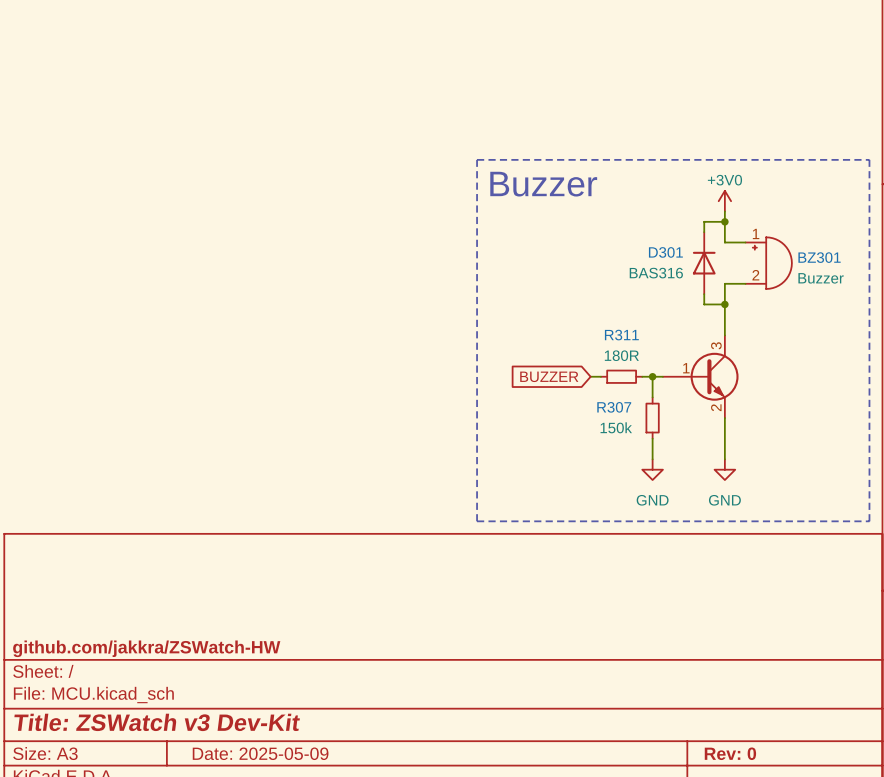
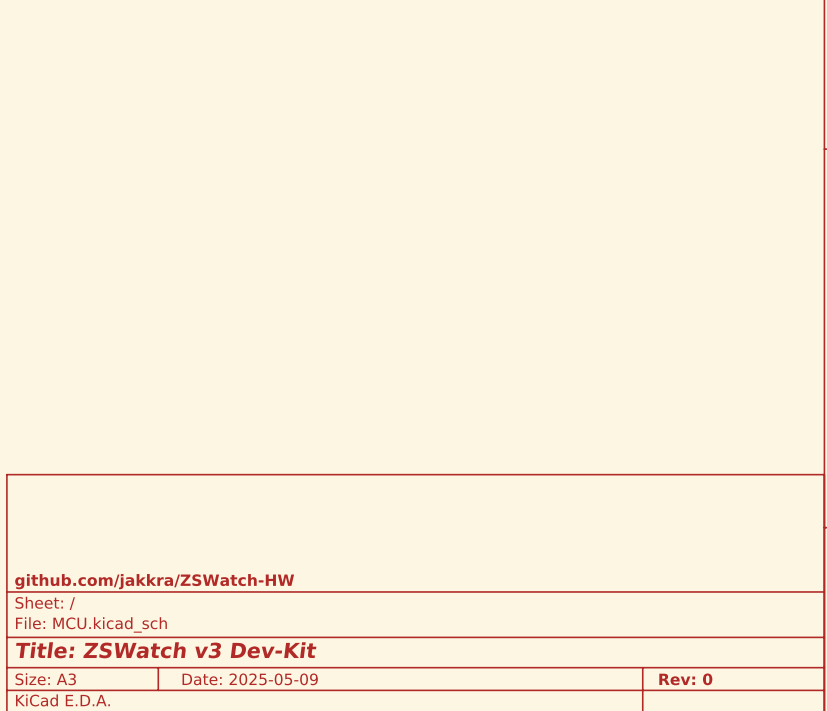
line: (477, 159) (477, 521) (869, 521) (869, 159) (477, 159) -> none
text: Buzzer (543, 184) -> none
power symbol: +3V0 (724, 201) -> none
wire: (724, 211) (724, 242) (745, 242) -> none
wire: (724, 221) (704, 221) (704, 232) -> none
junction: (724, 221) -> none
D301: BAS316 (704, 263) -> none
BZ301: Buzzer (768, 263) -> none
wire: (745, 283) (724, 283) (724, 335) -> none
wire: (704, 294) (704, 304) (724, 304) -> none
junction: (724, 304) -> none
global label: BUZZER (549, 376) -> none
wire: (590, 376) (600, 376) -> none
R311: 180R (621, 376) -> none
wire: (642, 376) (662, 376) -> none
wire: (652, 376) (652, 397) -> none
junction: (652, 376) -> none
part: (700, 376) -> none
R307: 150k (652, 418) -> none
wire: (724, 418) (724, 459) -> none
wire: (652, 438) (652, 459) -> none
power symbol: GND (652, 469) -> none
power symbol: GND (724, 469) -> none

